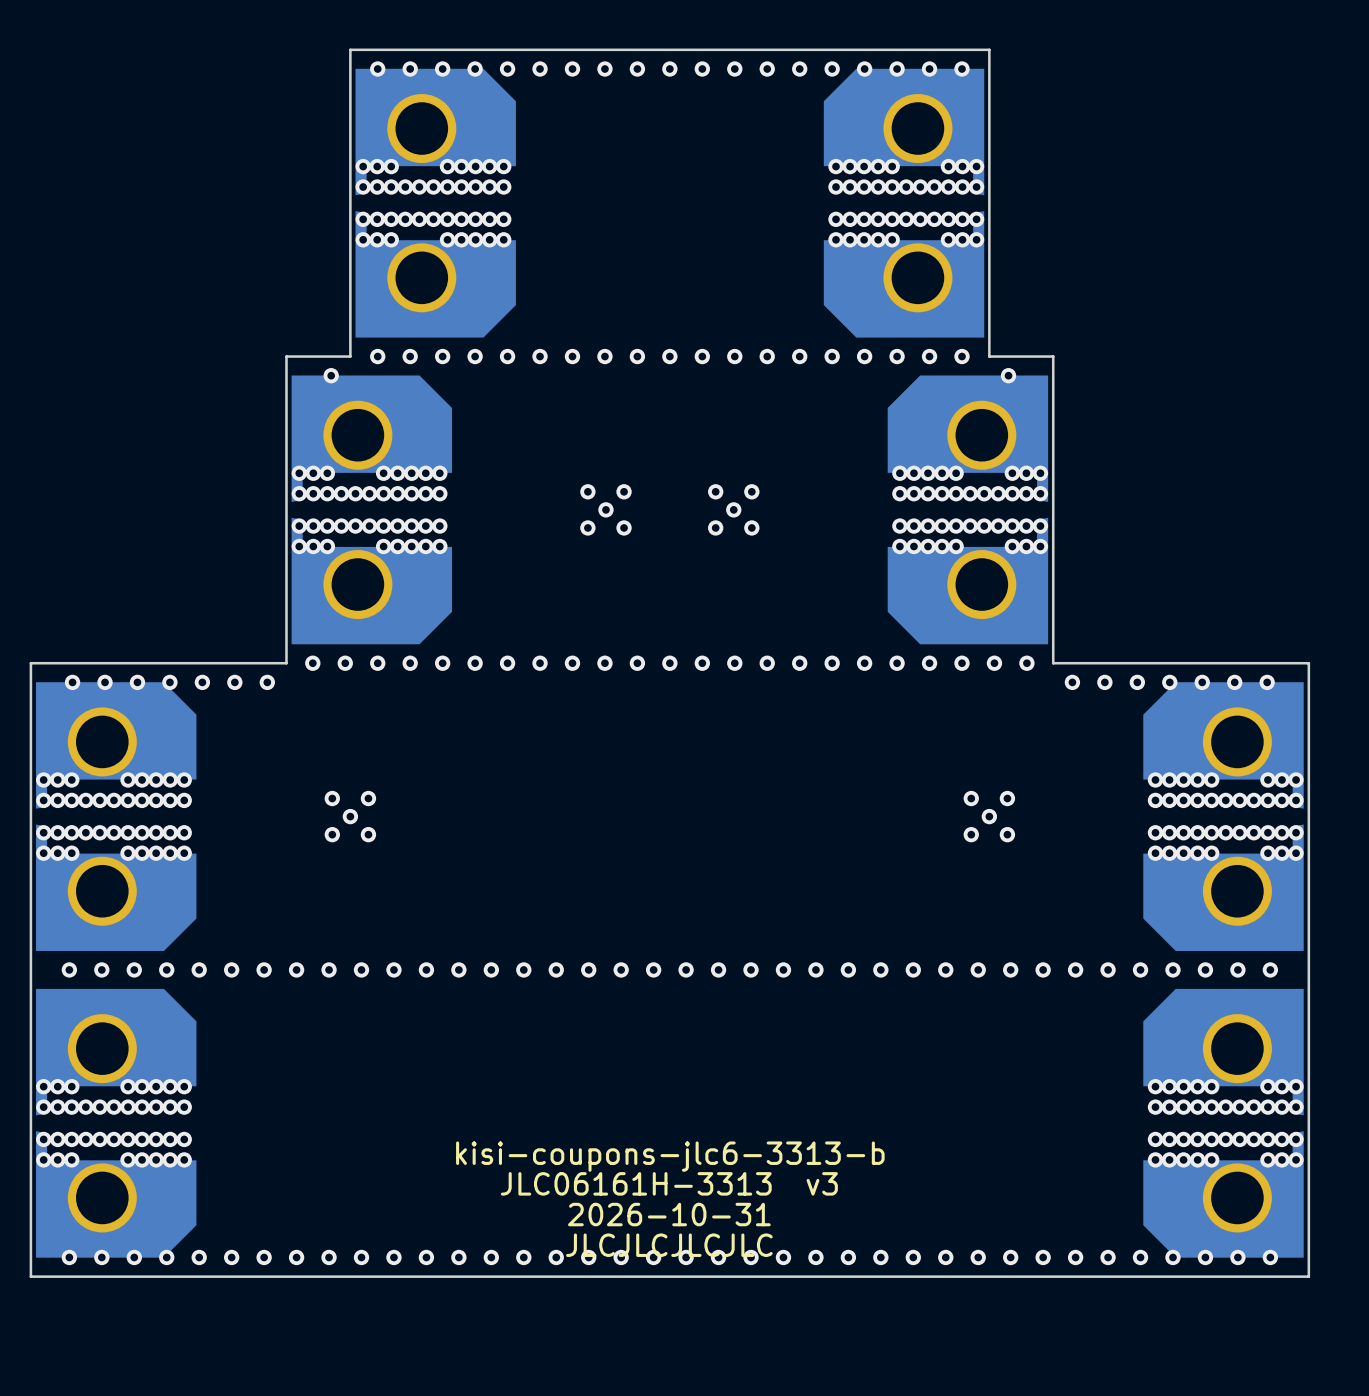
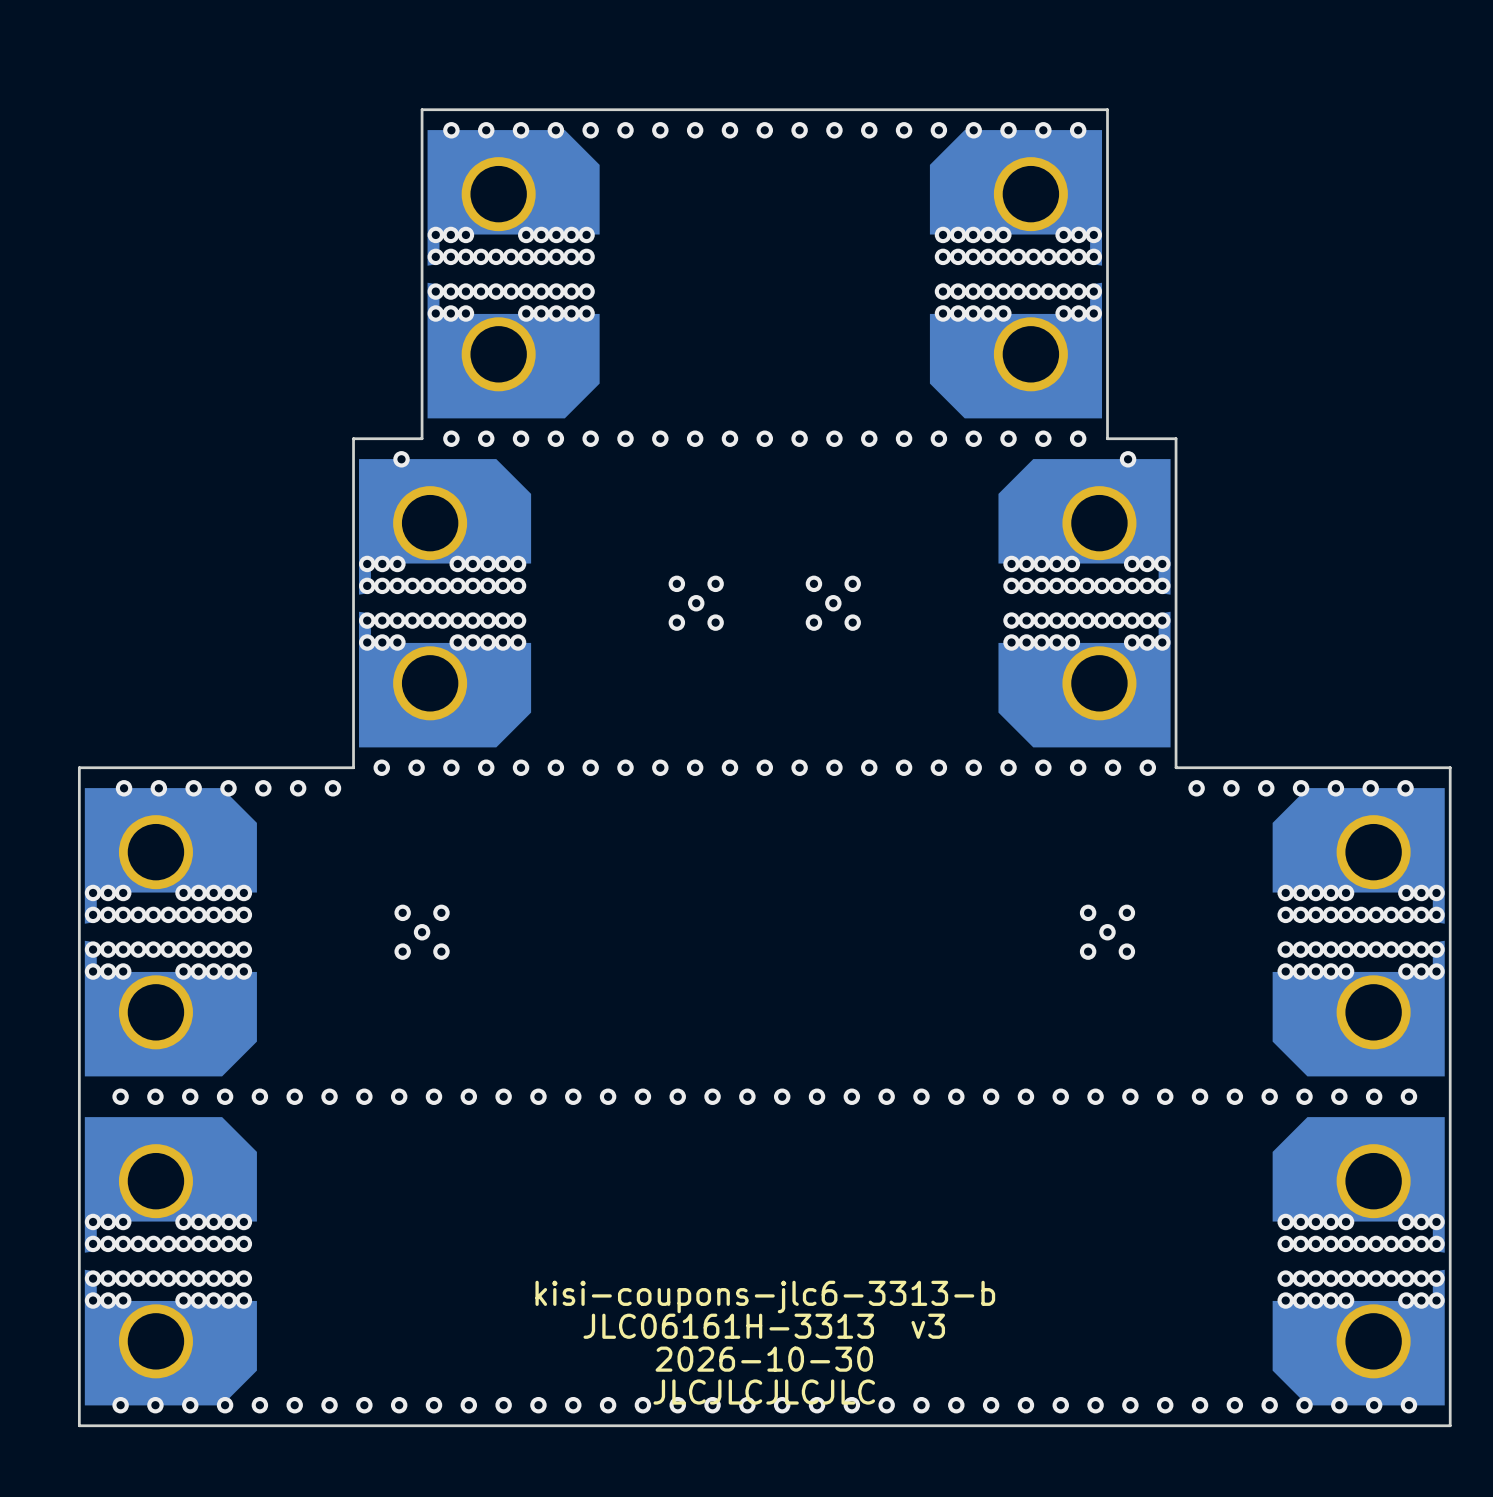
text: 2026-10-31 (669, 1214) -> 2026-10-30 (764, 1359)

